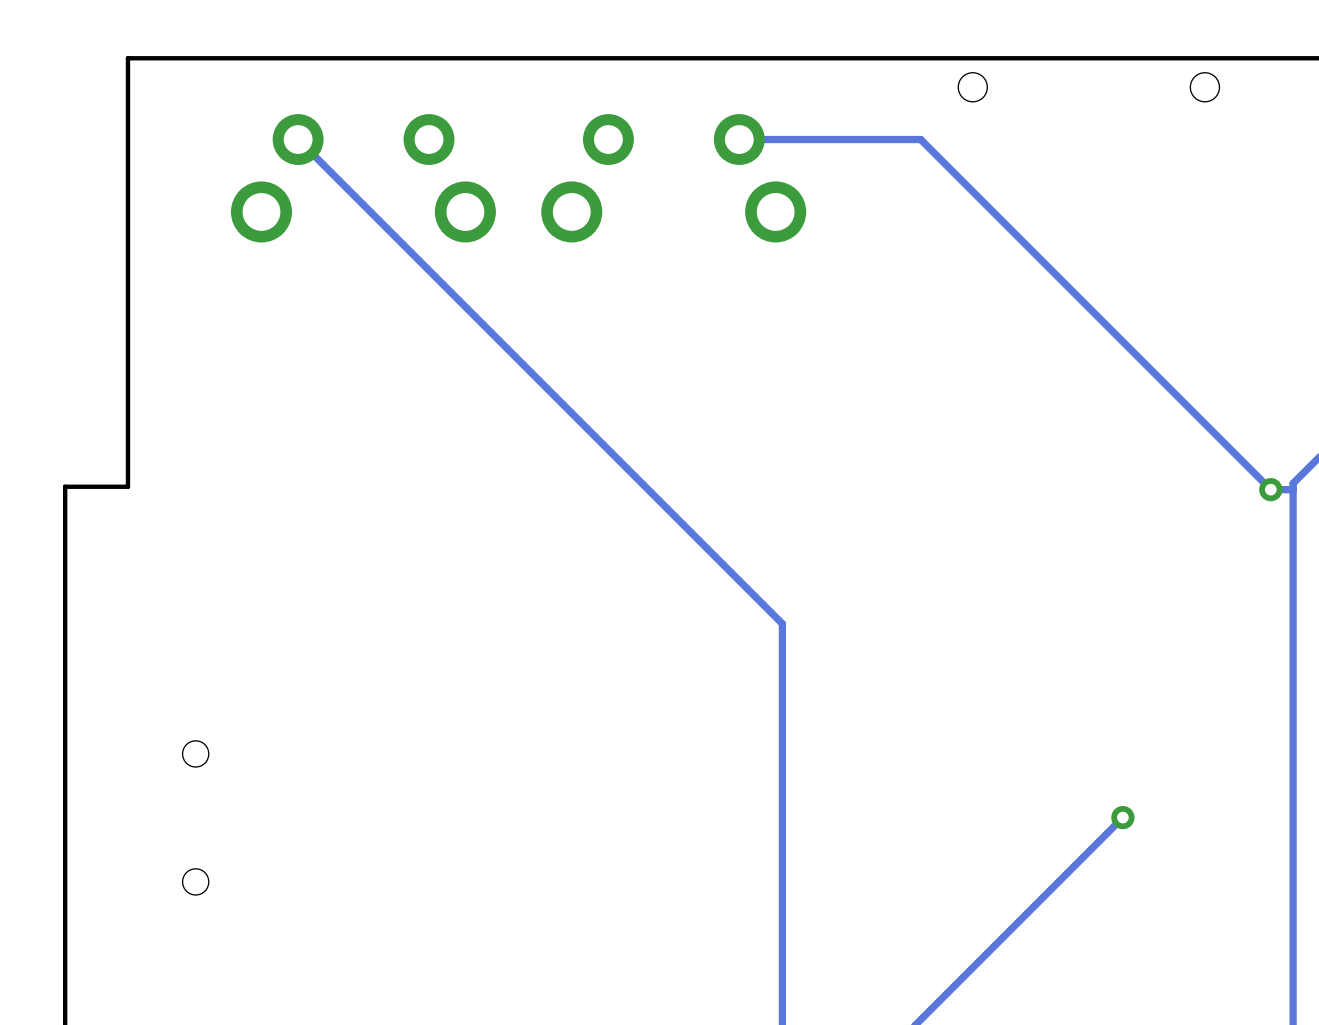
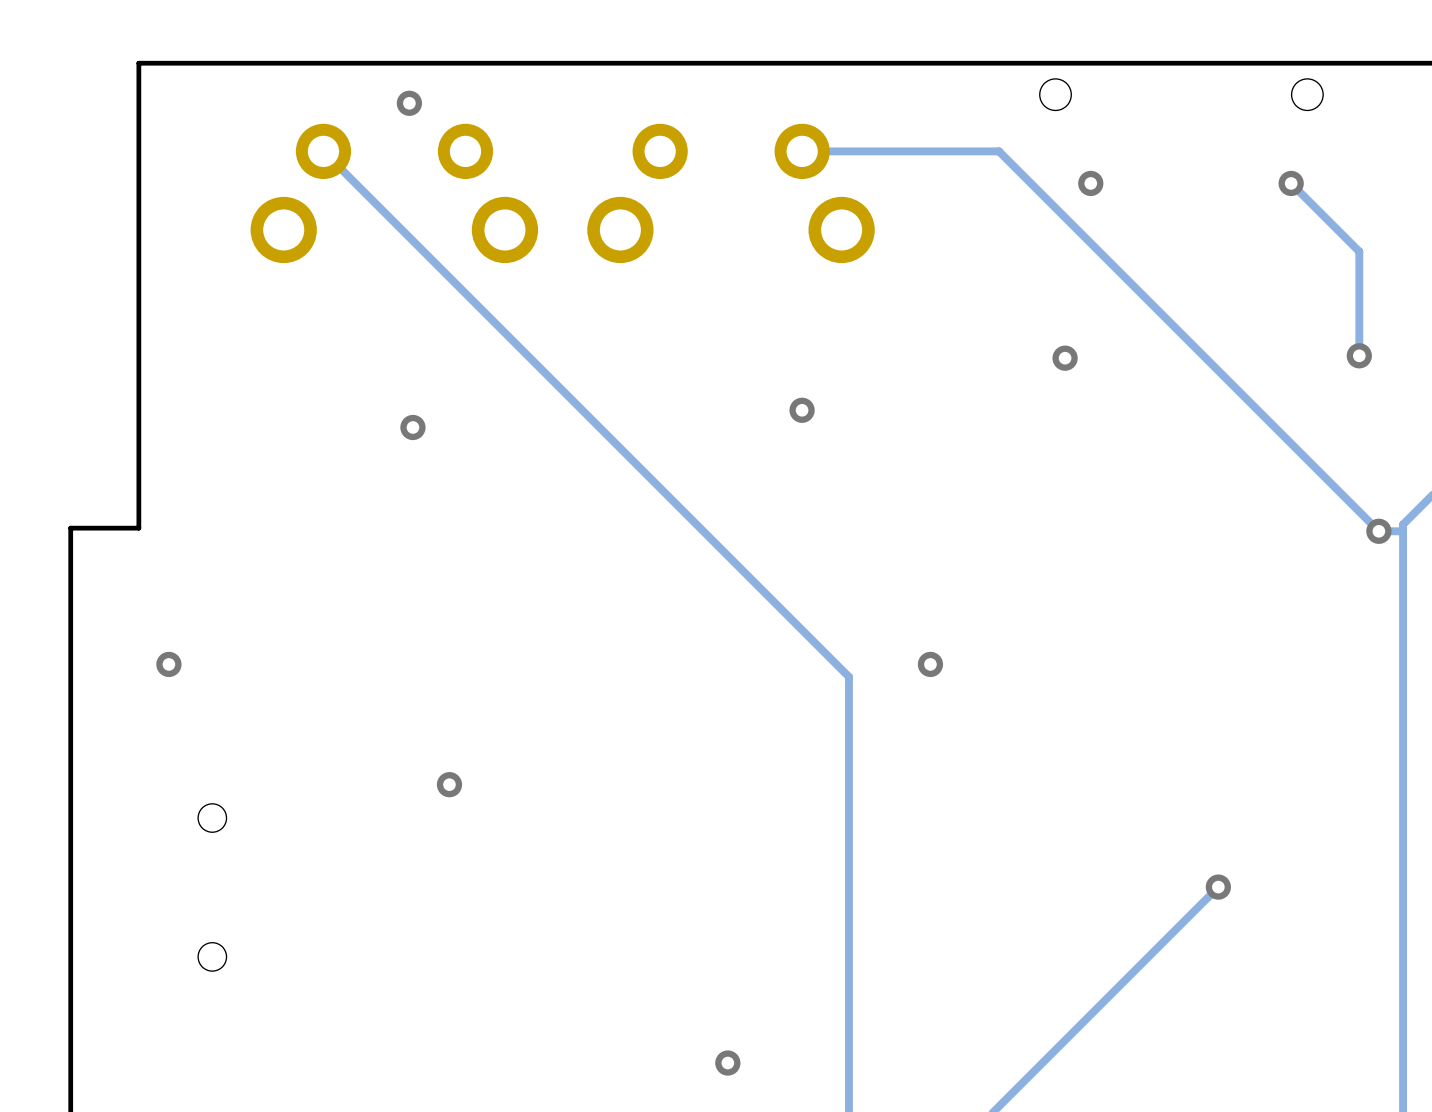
via: none -> (409, 103)
via: none -> (1090, 183)
track: none -> (1291, 183) (1359, 251) (1359, 355)
via: none -> (1291, 183)
via: none -> (1359, 355)
via: none -> (1065, 358)
via: none -> (802, 410)
via: none -> (412, 427)
via: none -> (168, 664)
via: none -> (930, 664)
via: none -> (449, 784)
via: none -> (727, 1063)

